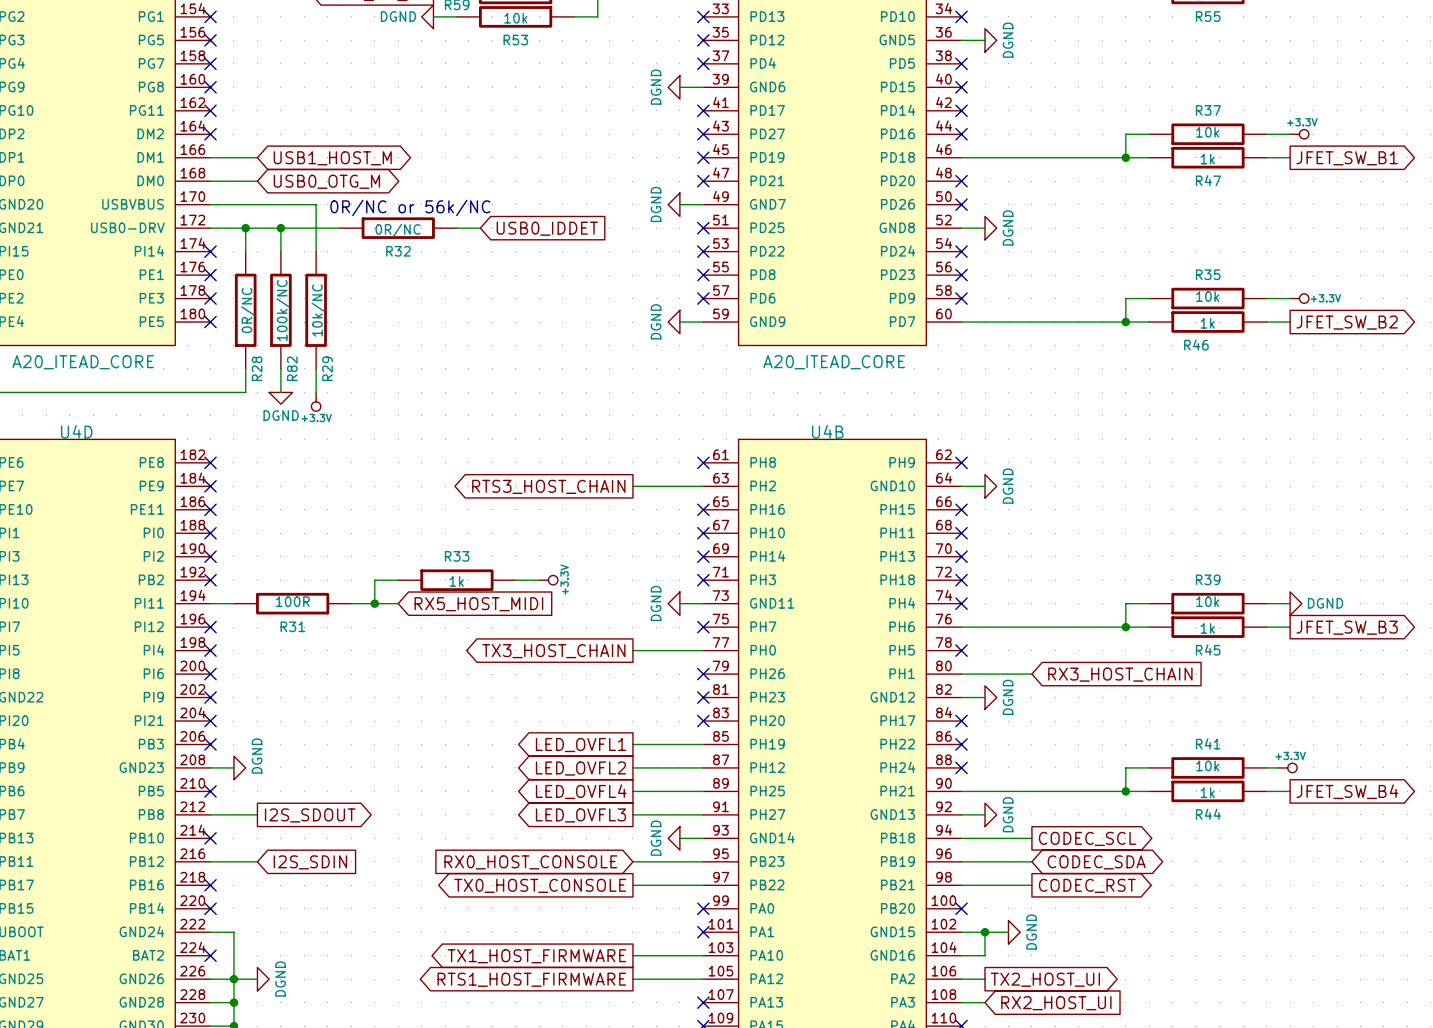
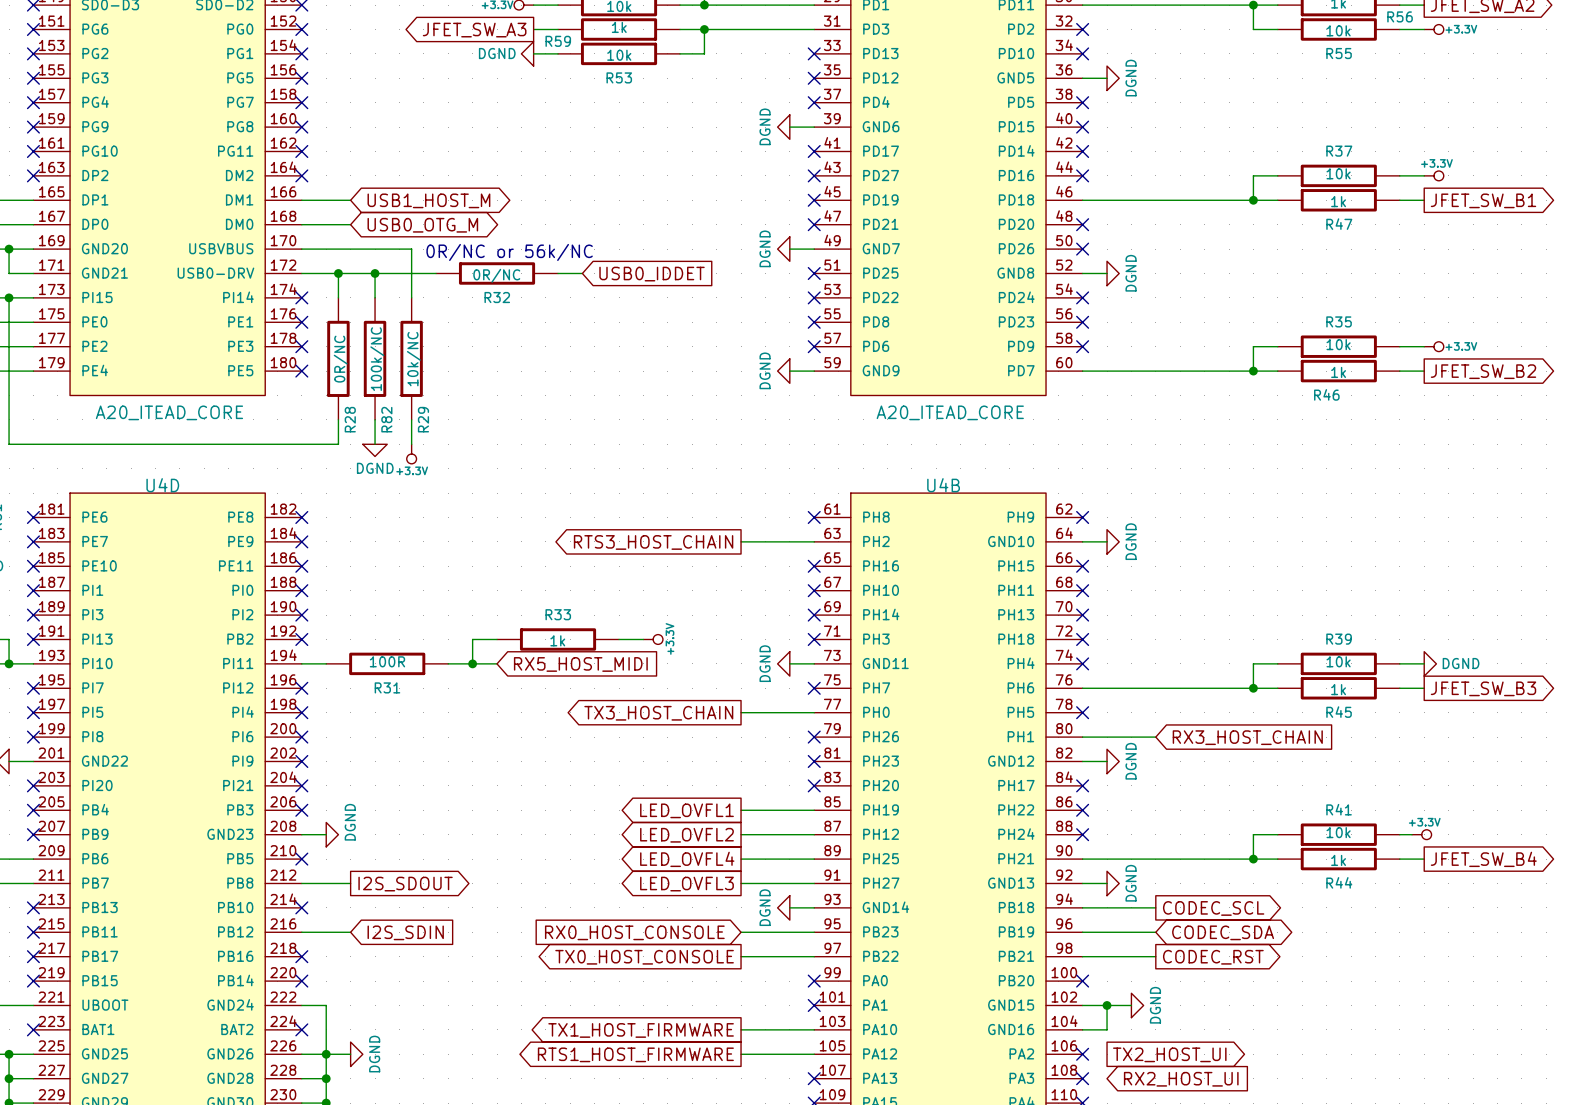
wire: (961, 979) (985, 979) -> none
no-connect mark: none -> (1082, 1054)
wire: (961, 1002) (985, 1002) -> none
no-connect mark: none -> (1082, 1078)

